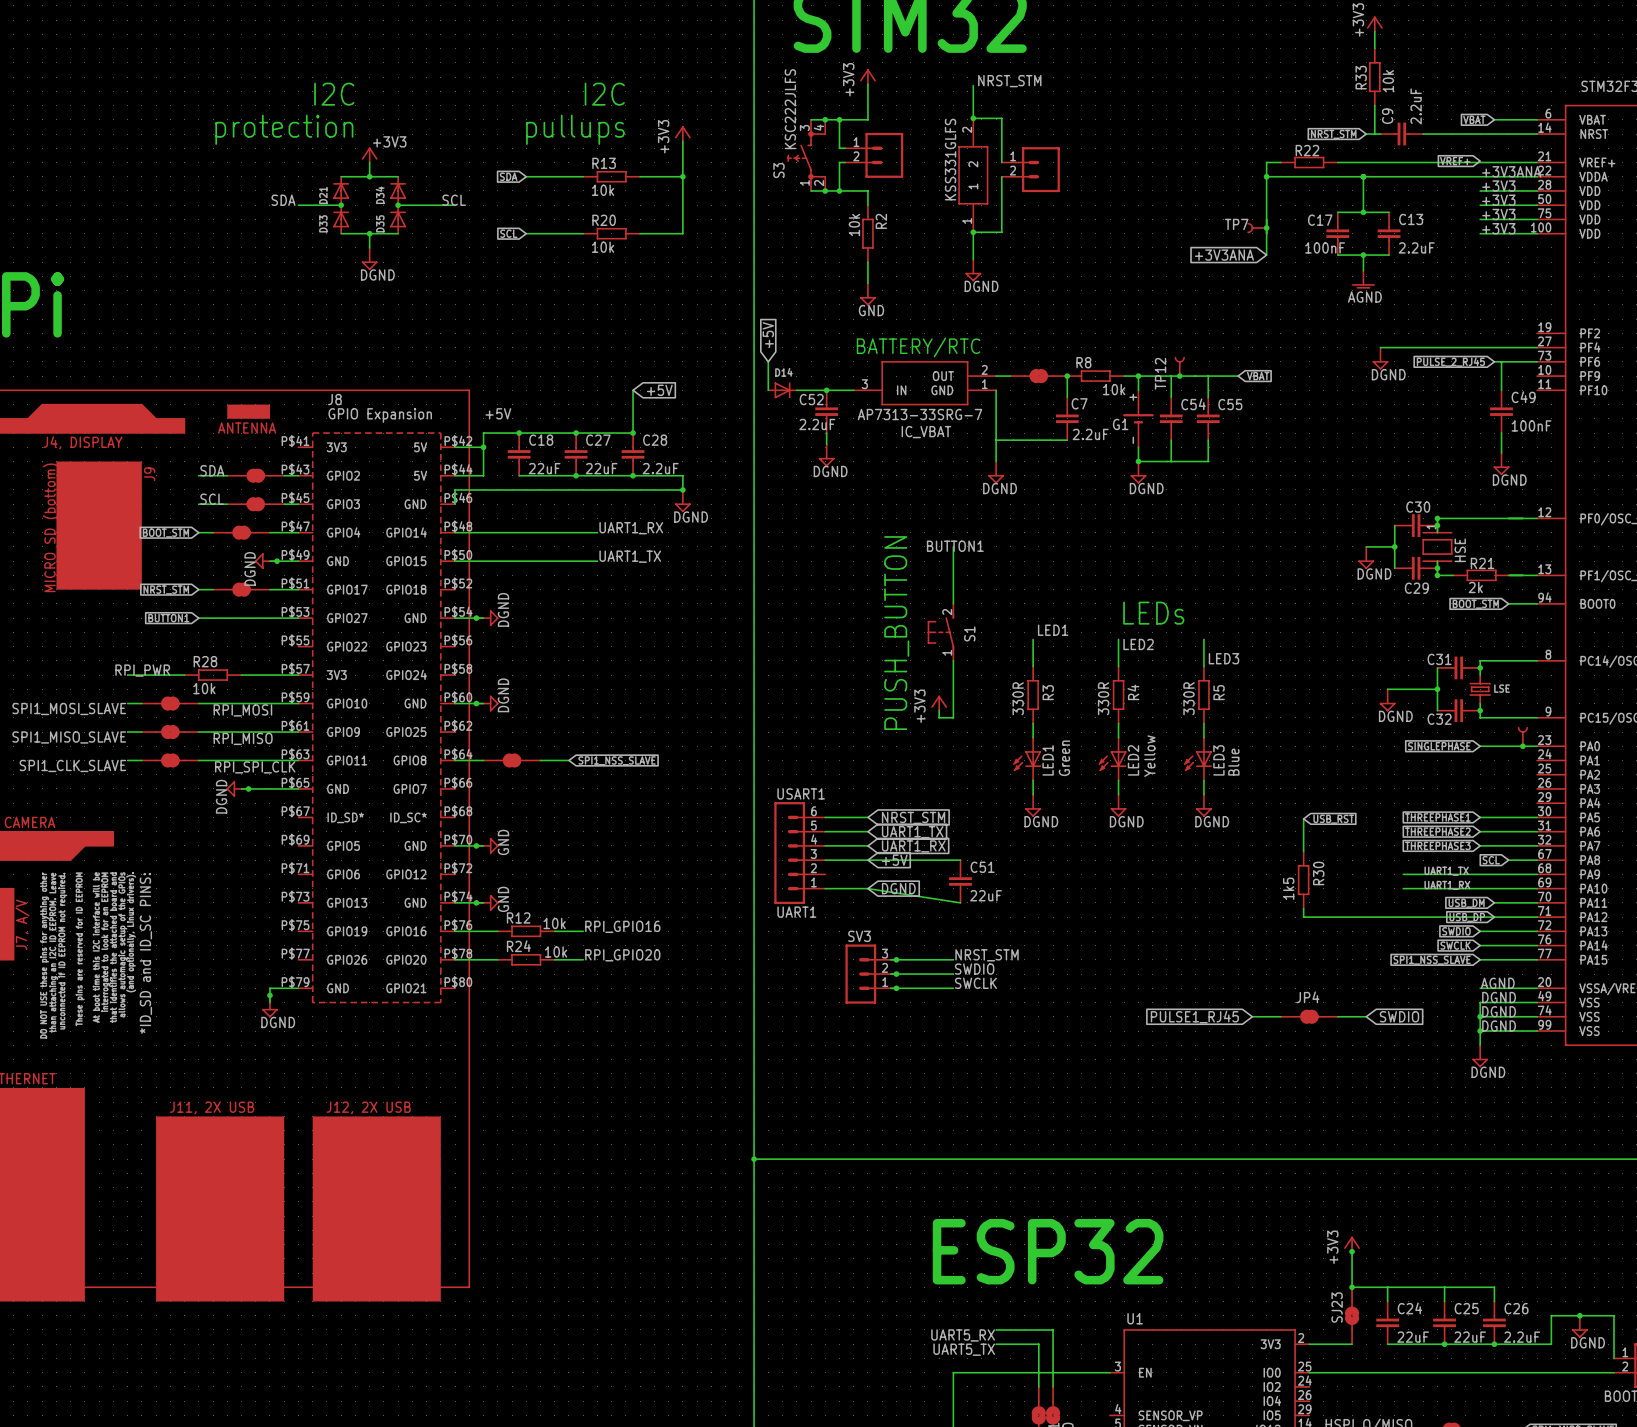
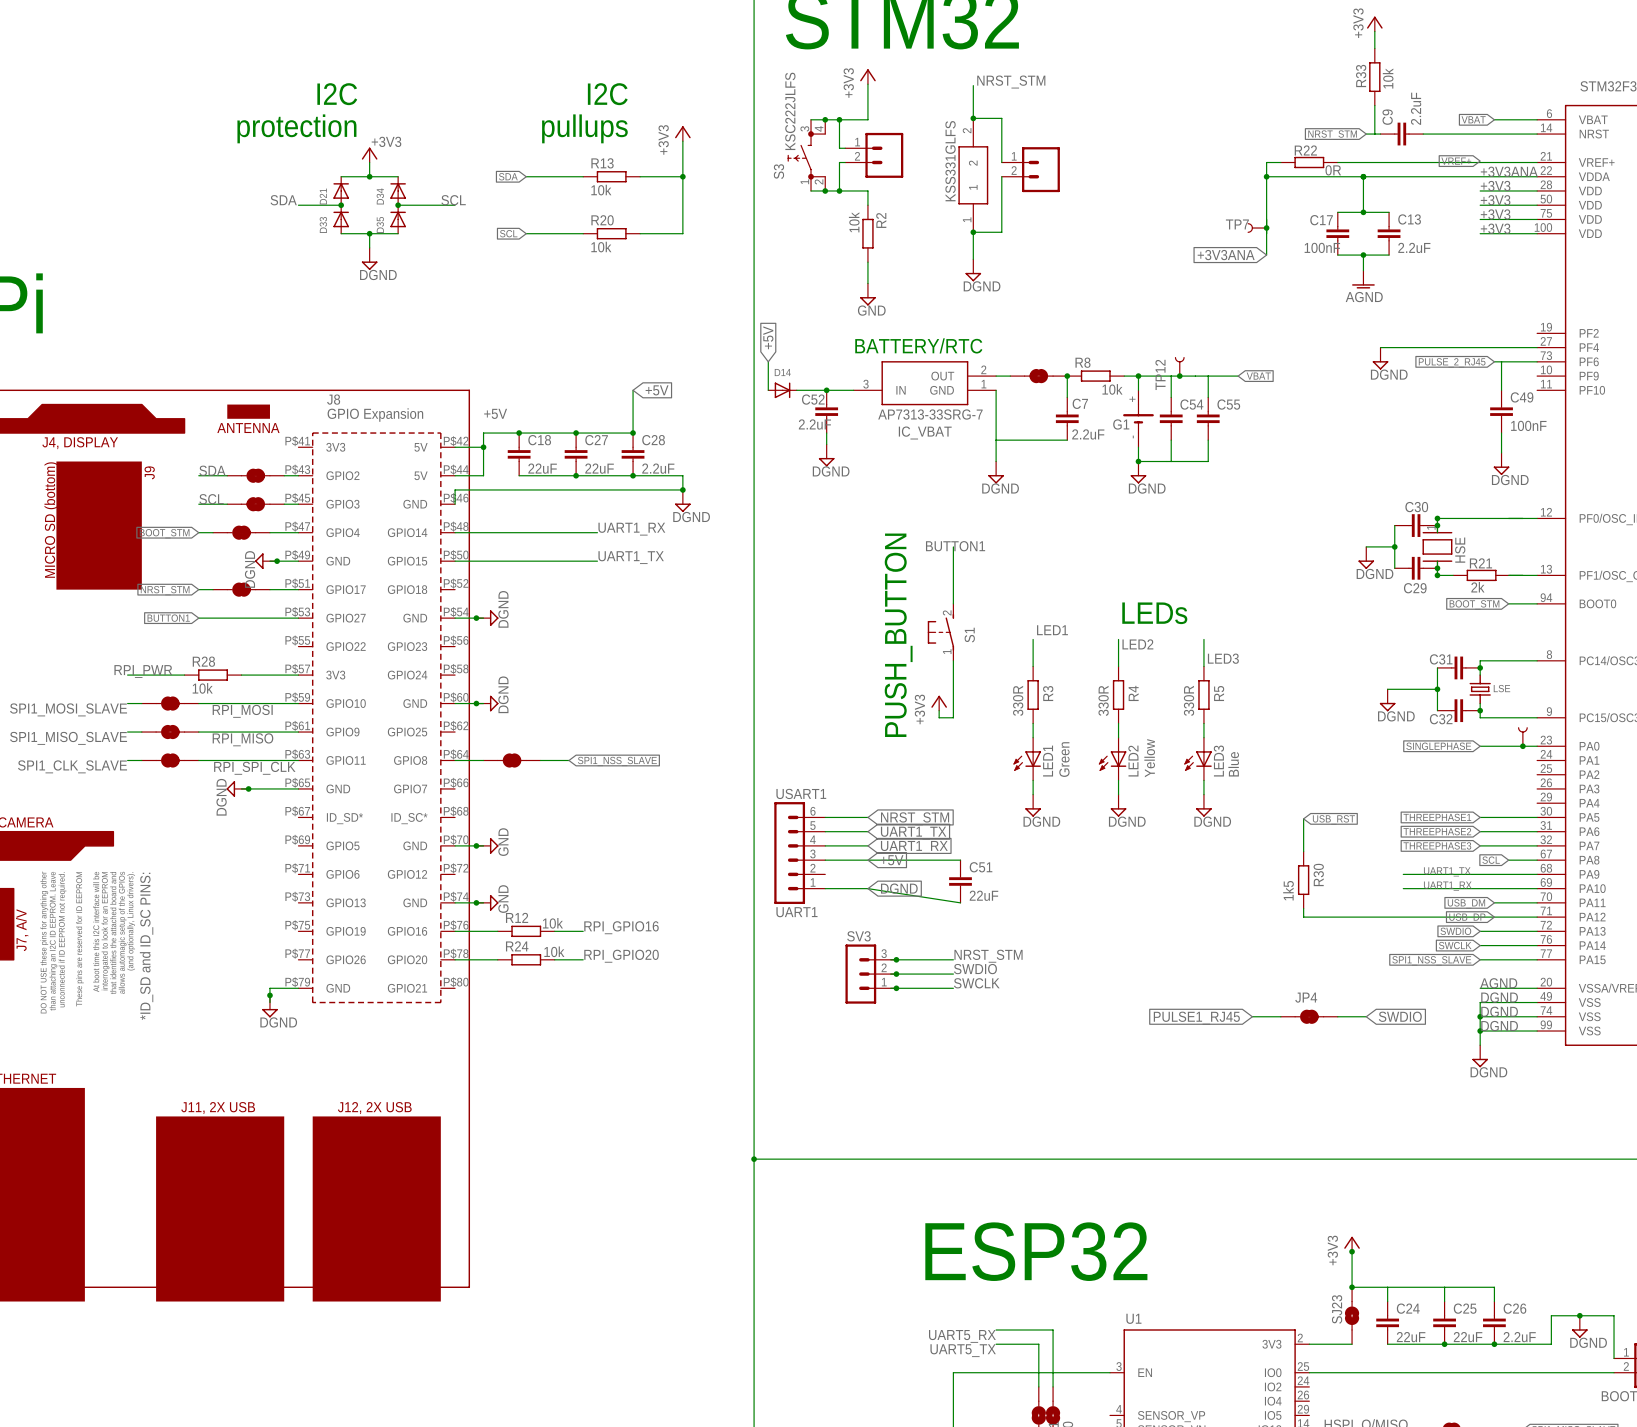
R22 value: none -> 0R (1333, 170)

